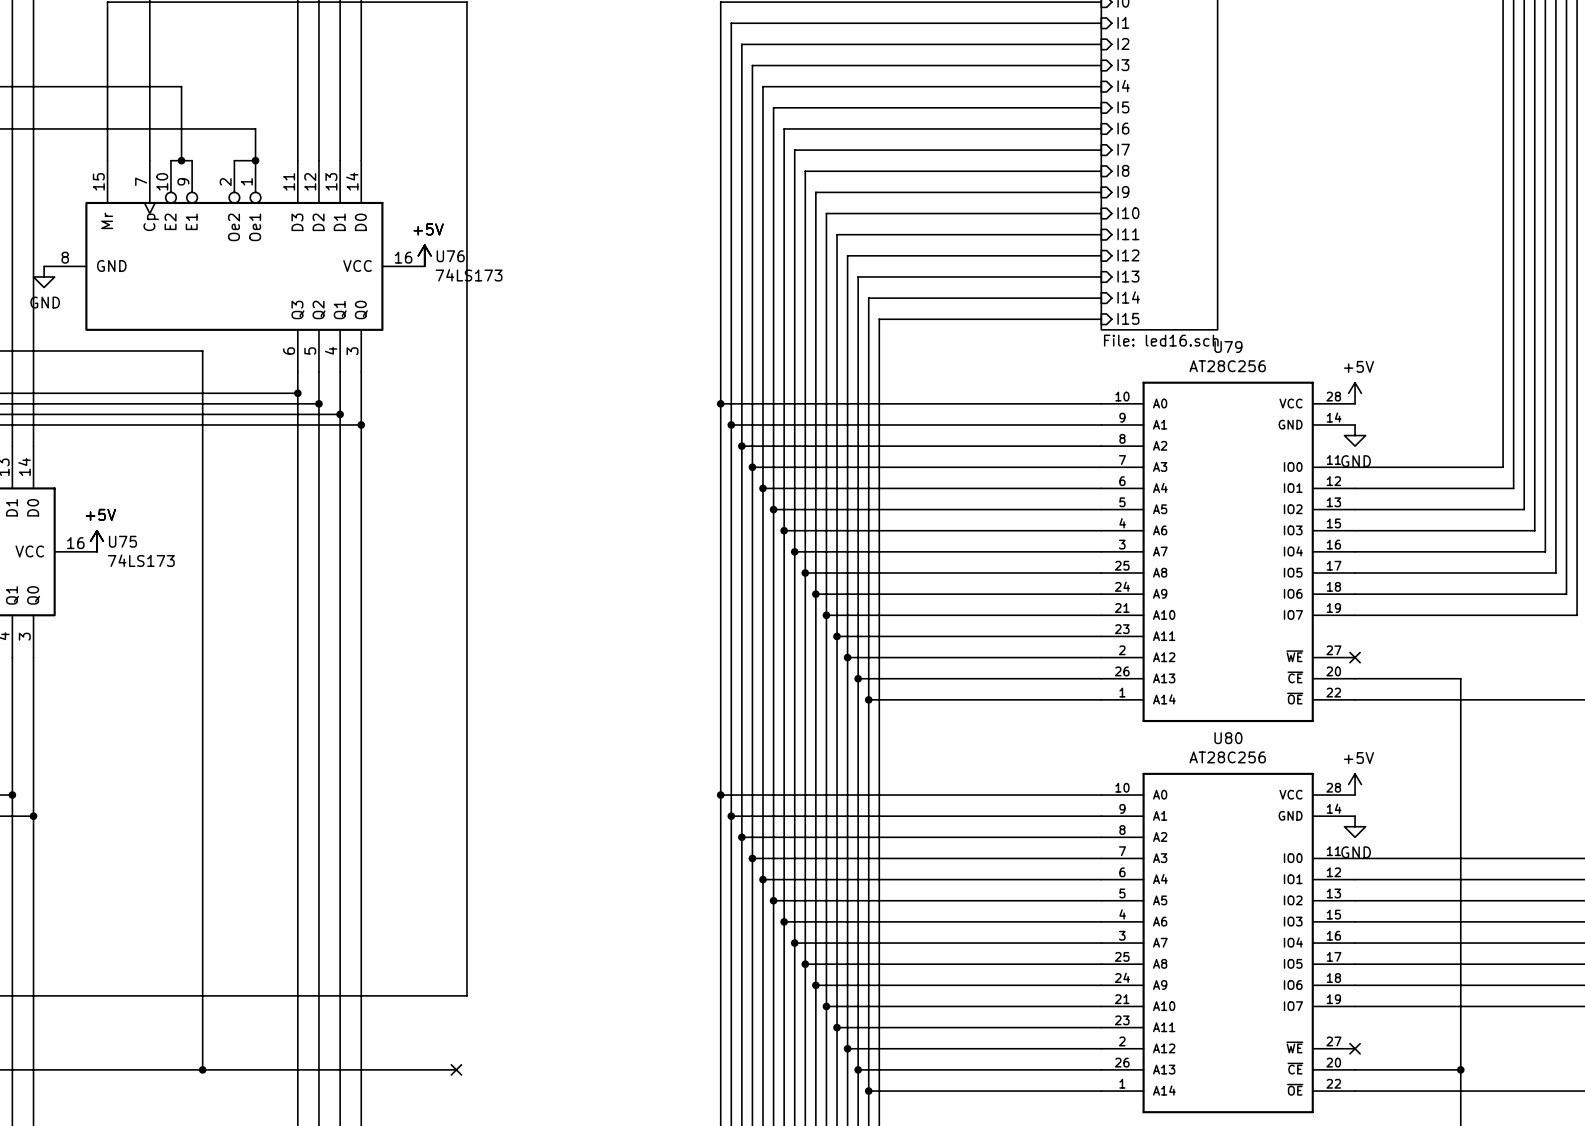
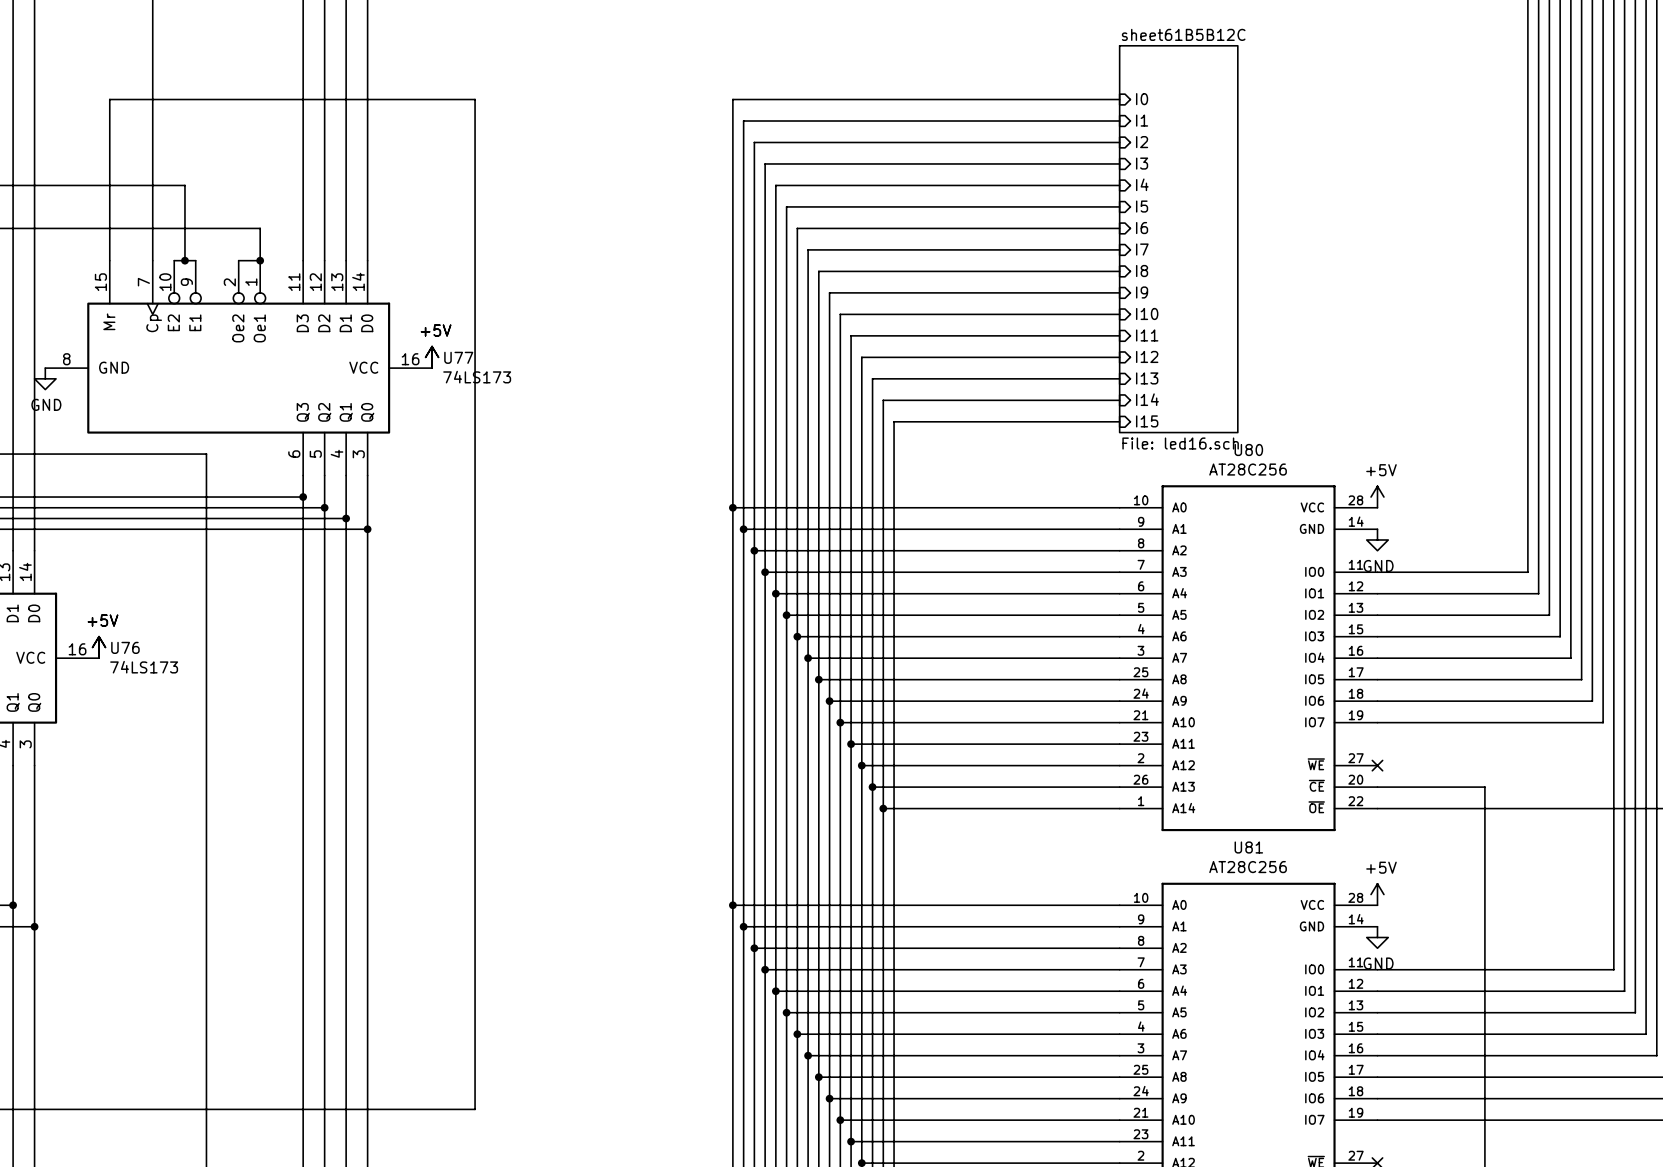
U76 name: U76 (450, 256) -> U77 (458, 357)
U79 name: U79 (1228, 346) -> U80 (1248, 449)
U75 name: U75 (122, 541) -> U76 (125, 647)
U80 name: U80 (1228, 738) -> U81 (1248, 847)

